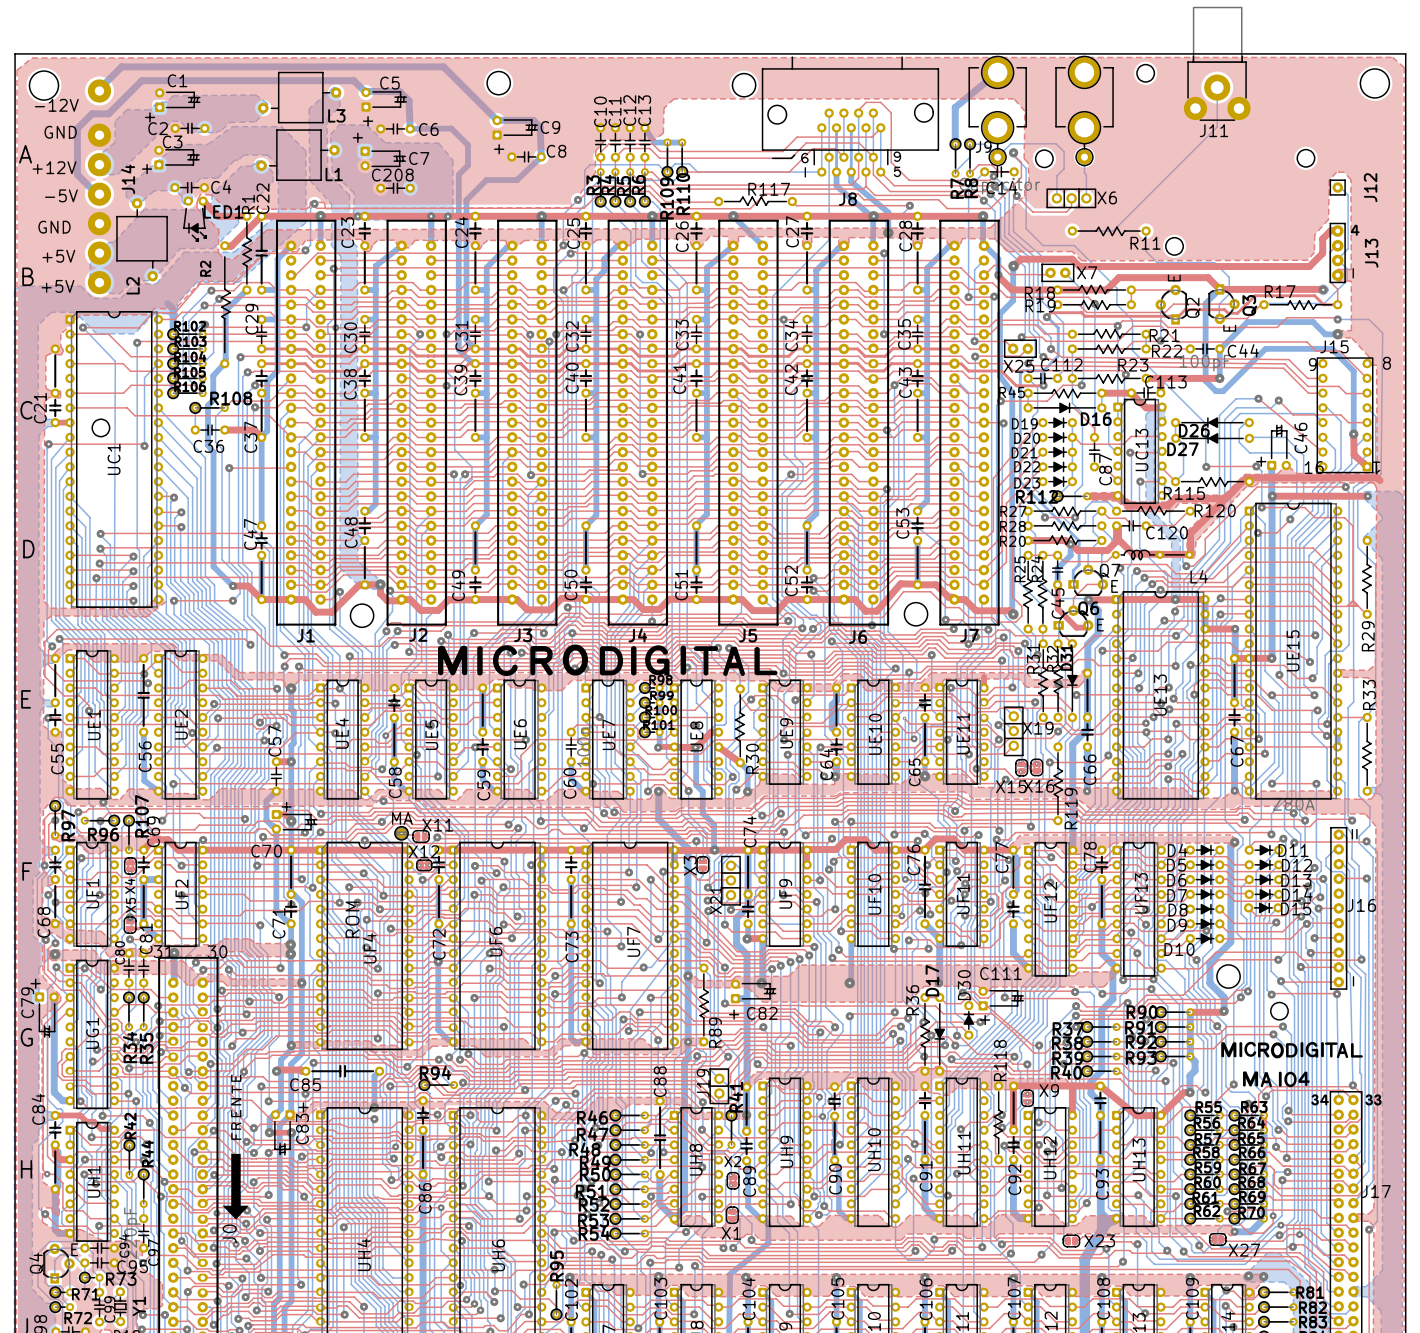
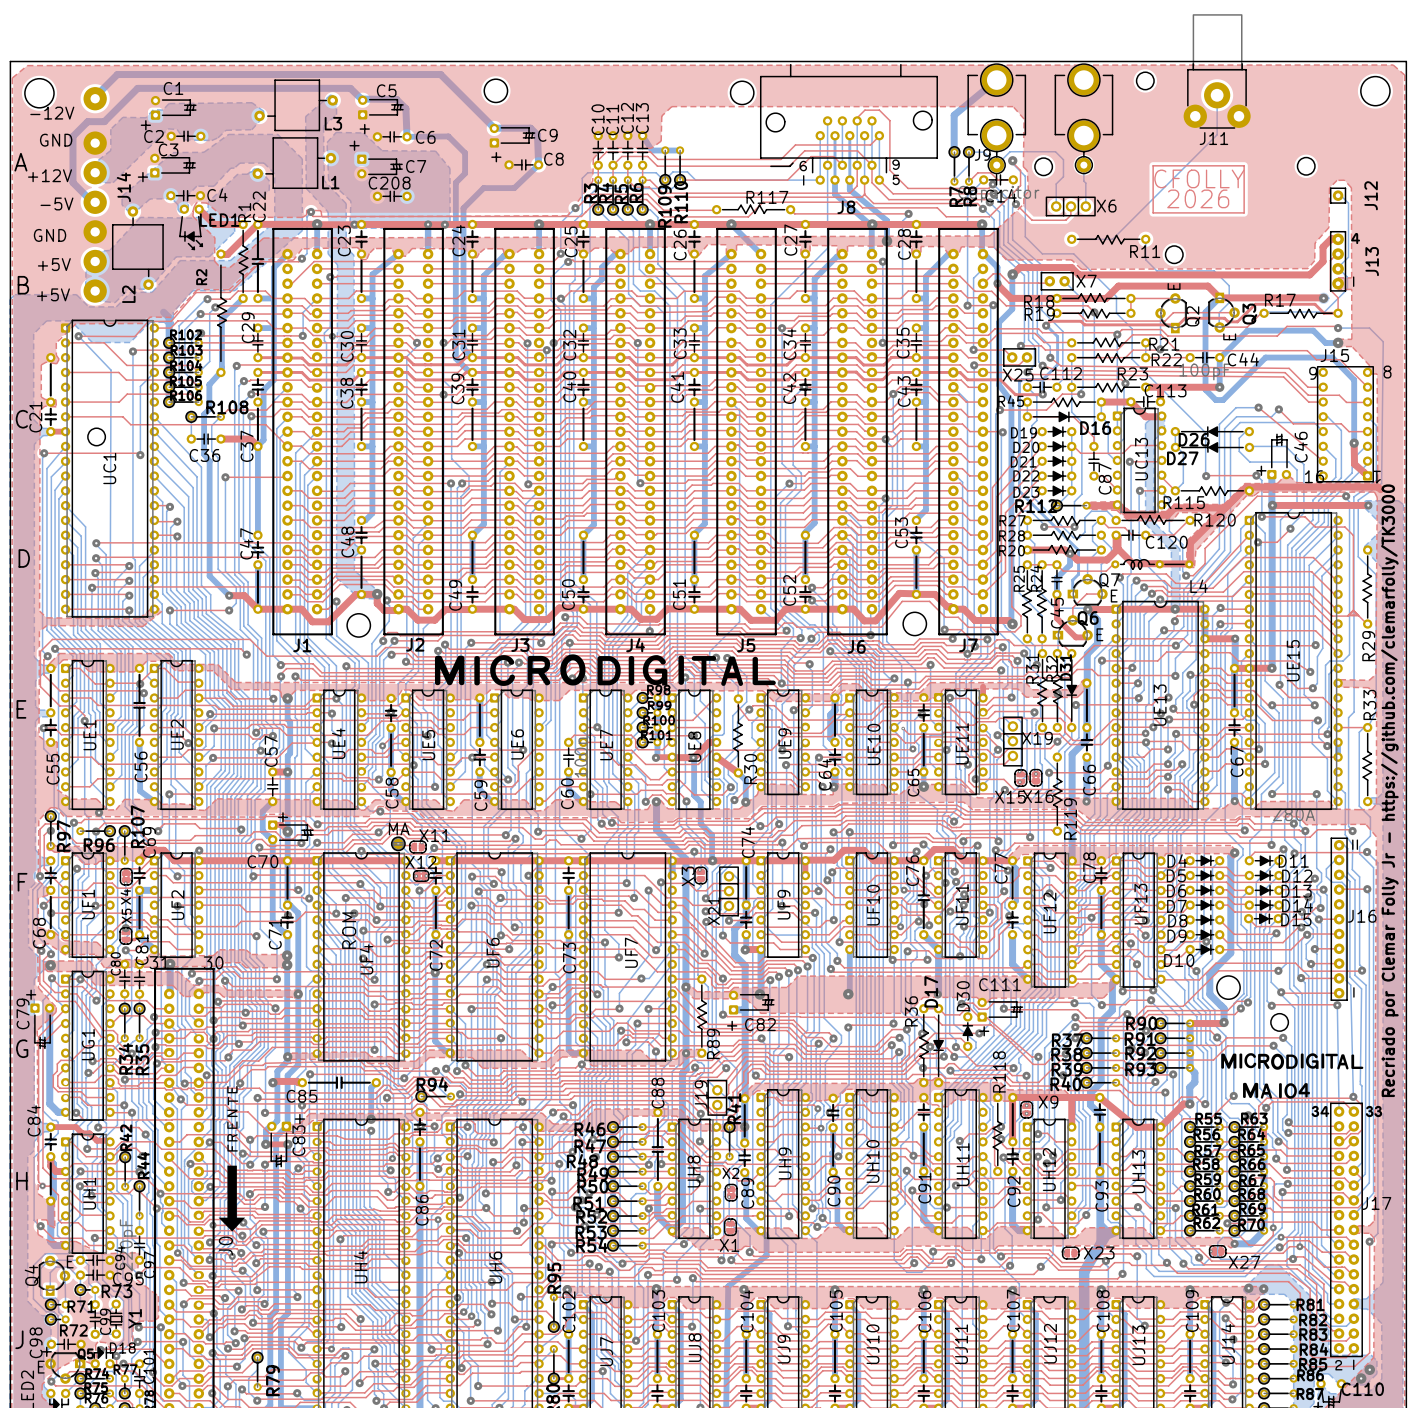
top track: none -> (1153, 165) (1244, 165) (1244, 212) (1153, 212) (1153, 165)
text: none -> CFOLLY (1199, 178)
text: none -> 2026 (1198, 198)
text: none -> Recriado por Clemar Folly Jr - https://github.com/clemarfolly/TK3000 (1389, 790)

